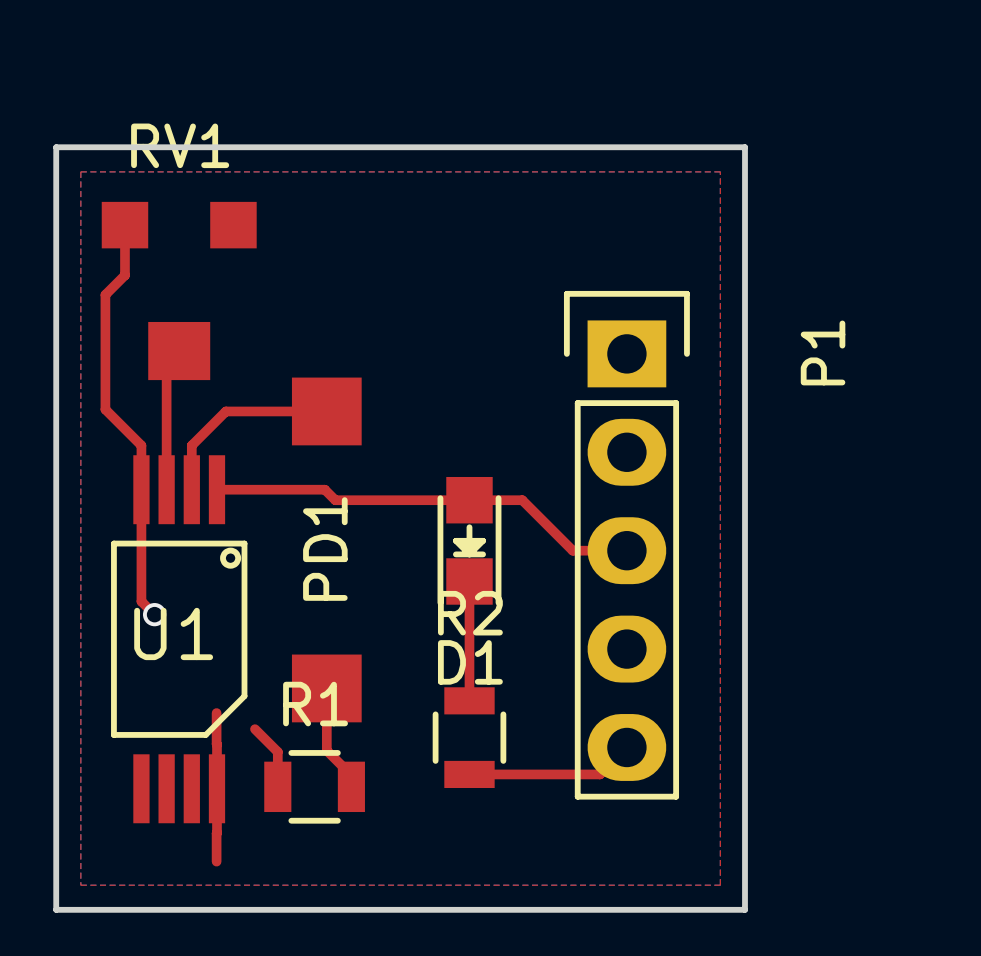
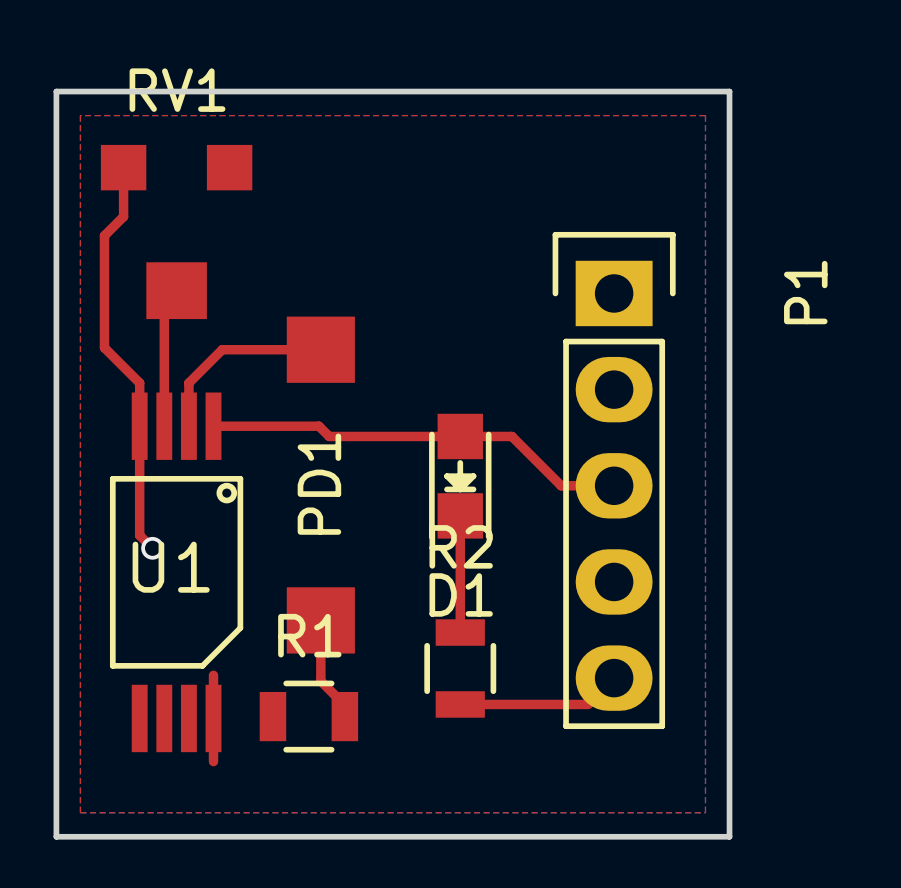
top track: (216, 713) (216, 744) -> none
top track: (254, 729) (277, 751) (277, 786) -> none
top track: (216, 833) (216, 861) -> none

